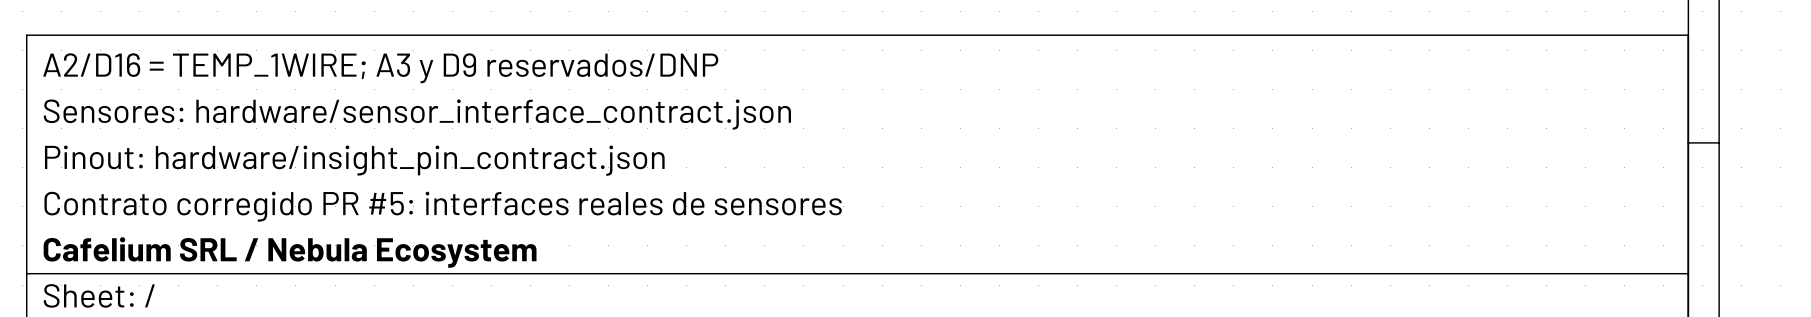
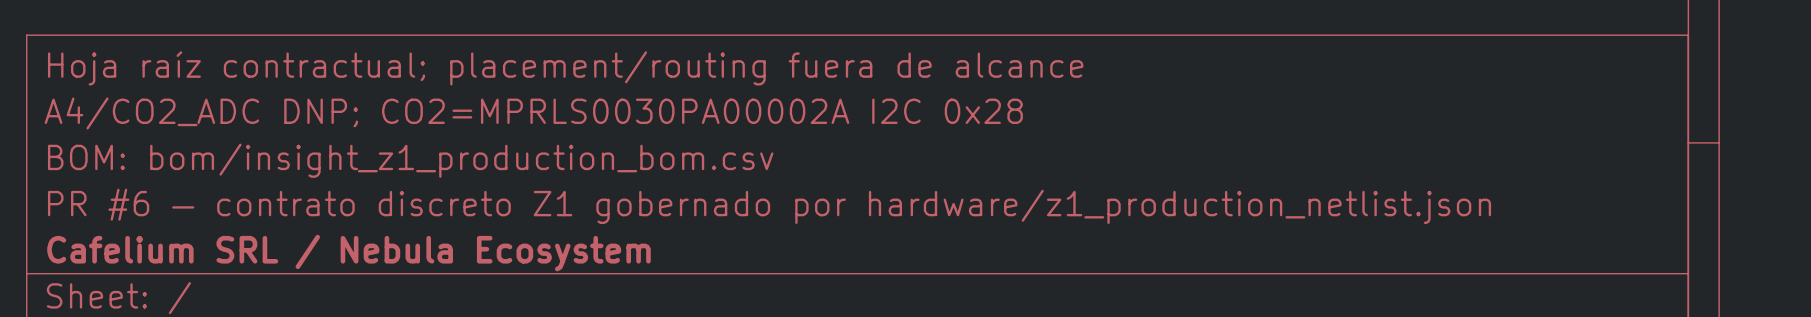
title block: A2/D16 = TEMP_1WIRE; A3 y D9 reservados/DNP (380, 68) -> Hoja raíz contractual; placement/routing fuera de alcance (565, 68)
title block: Sensores: hardware/sensor_interface_contract.json (417, 114) -> A4/CO2_ADC DNP; CO2=MPRLS0030PA00002A I2C 0x28 (533, 113)
title block: Pinout: hardware/insight_pin_contract.json (354, 160) -> BOM: bom/insight_z1_production_bom.csv (410, 160)
title block: Contrato corregido PR #5: interfaces reales de sensores (443, 206) -> PR #6 — contrato discreto Z1 gobernado por hardware/z1_production_netlist.json (769, 206)

